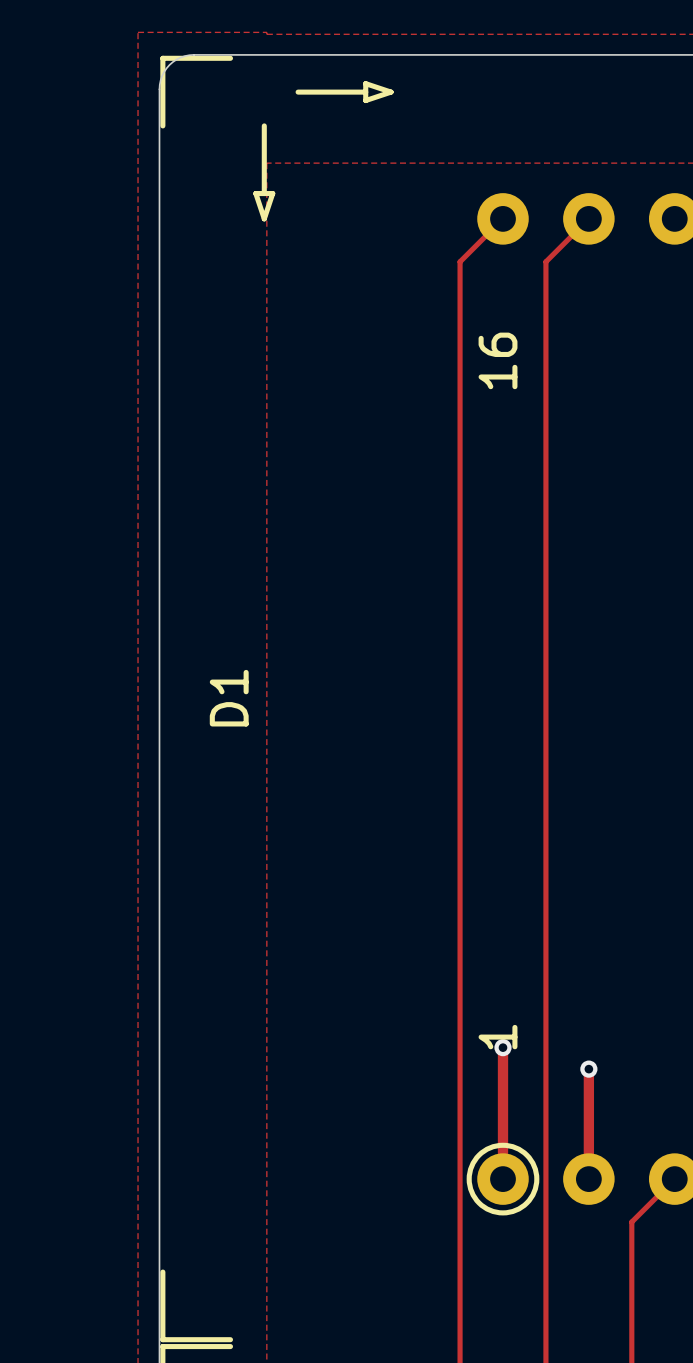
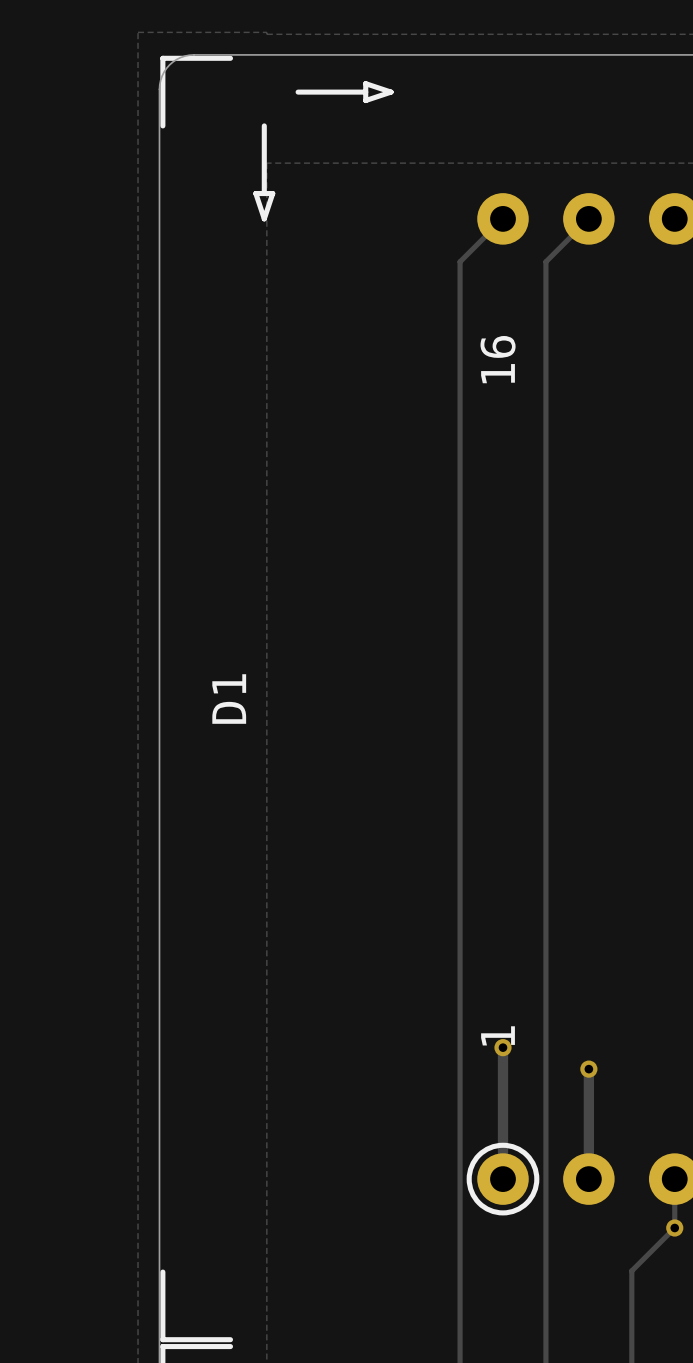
track: (674, 1179) (631, 1222) (631, 1270) -> (674, 1179) (674, 1227) (631, 1270)
via: none -> (674, 1227)

